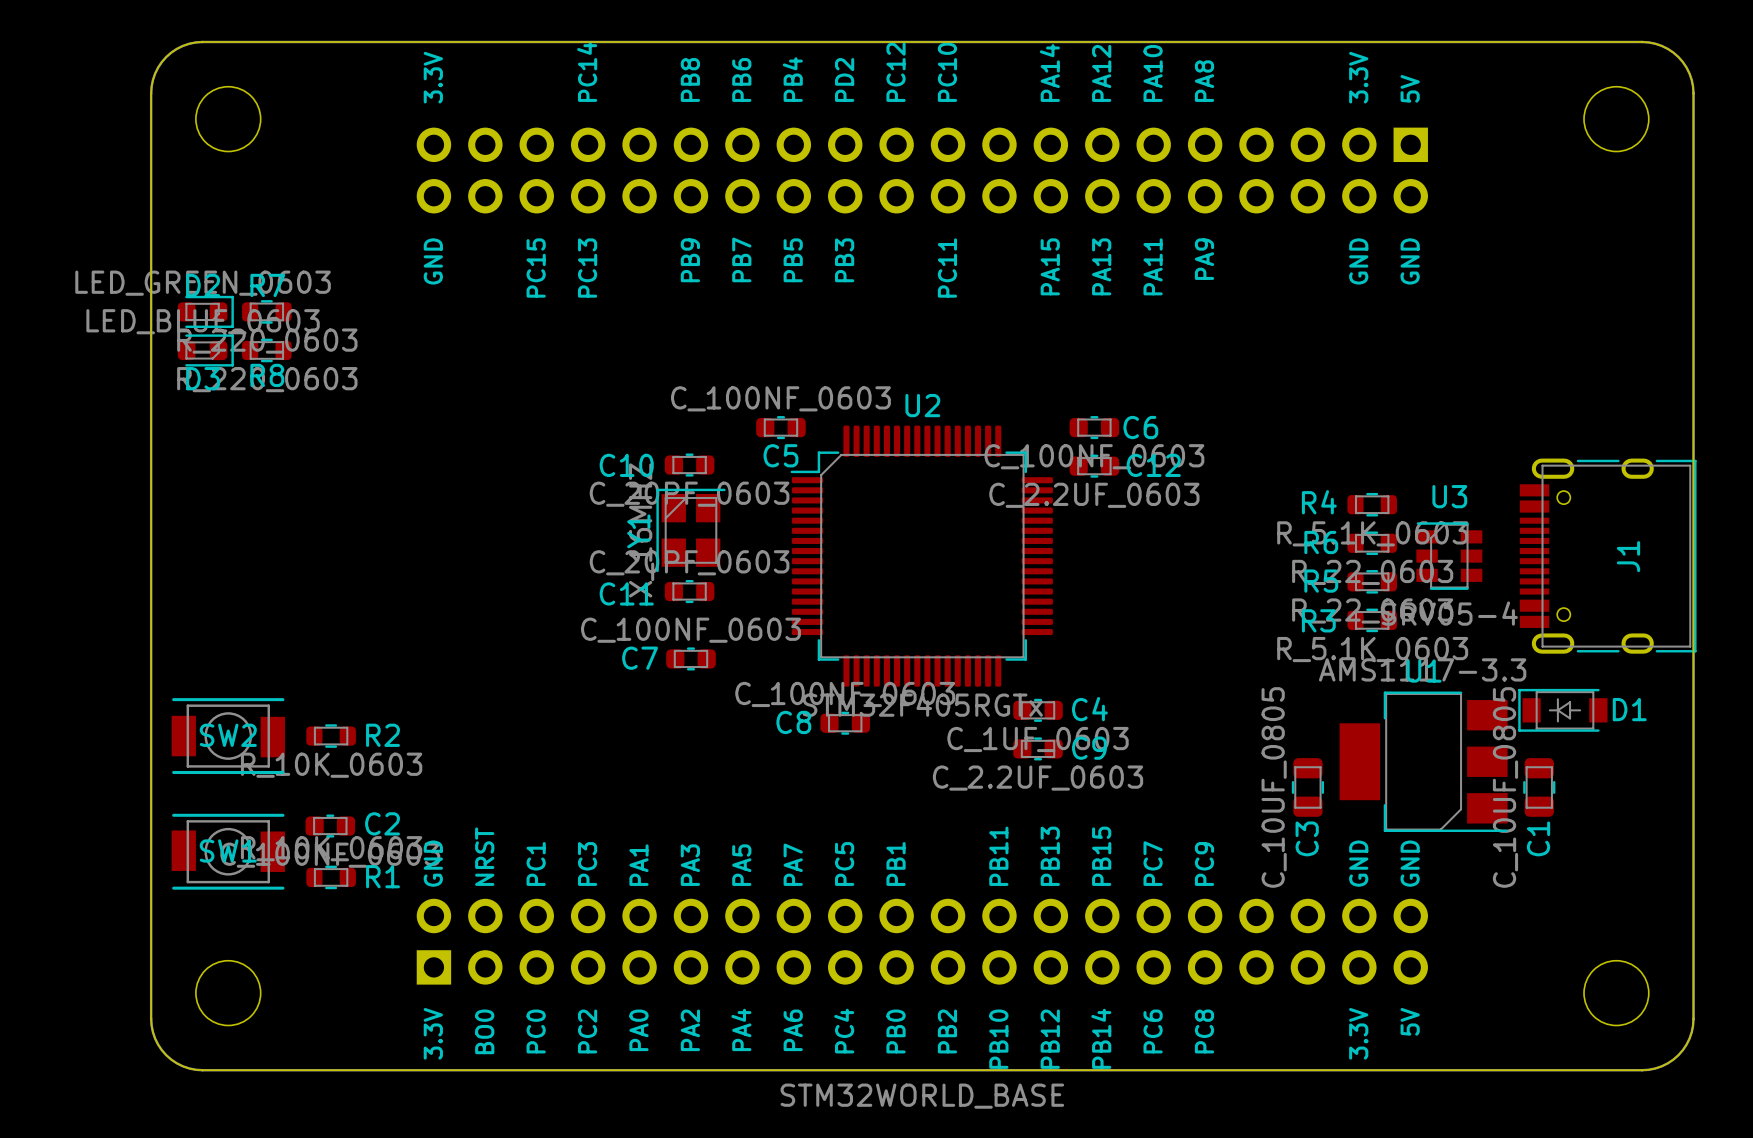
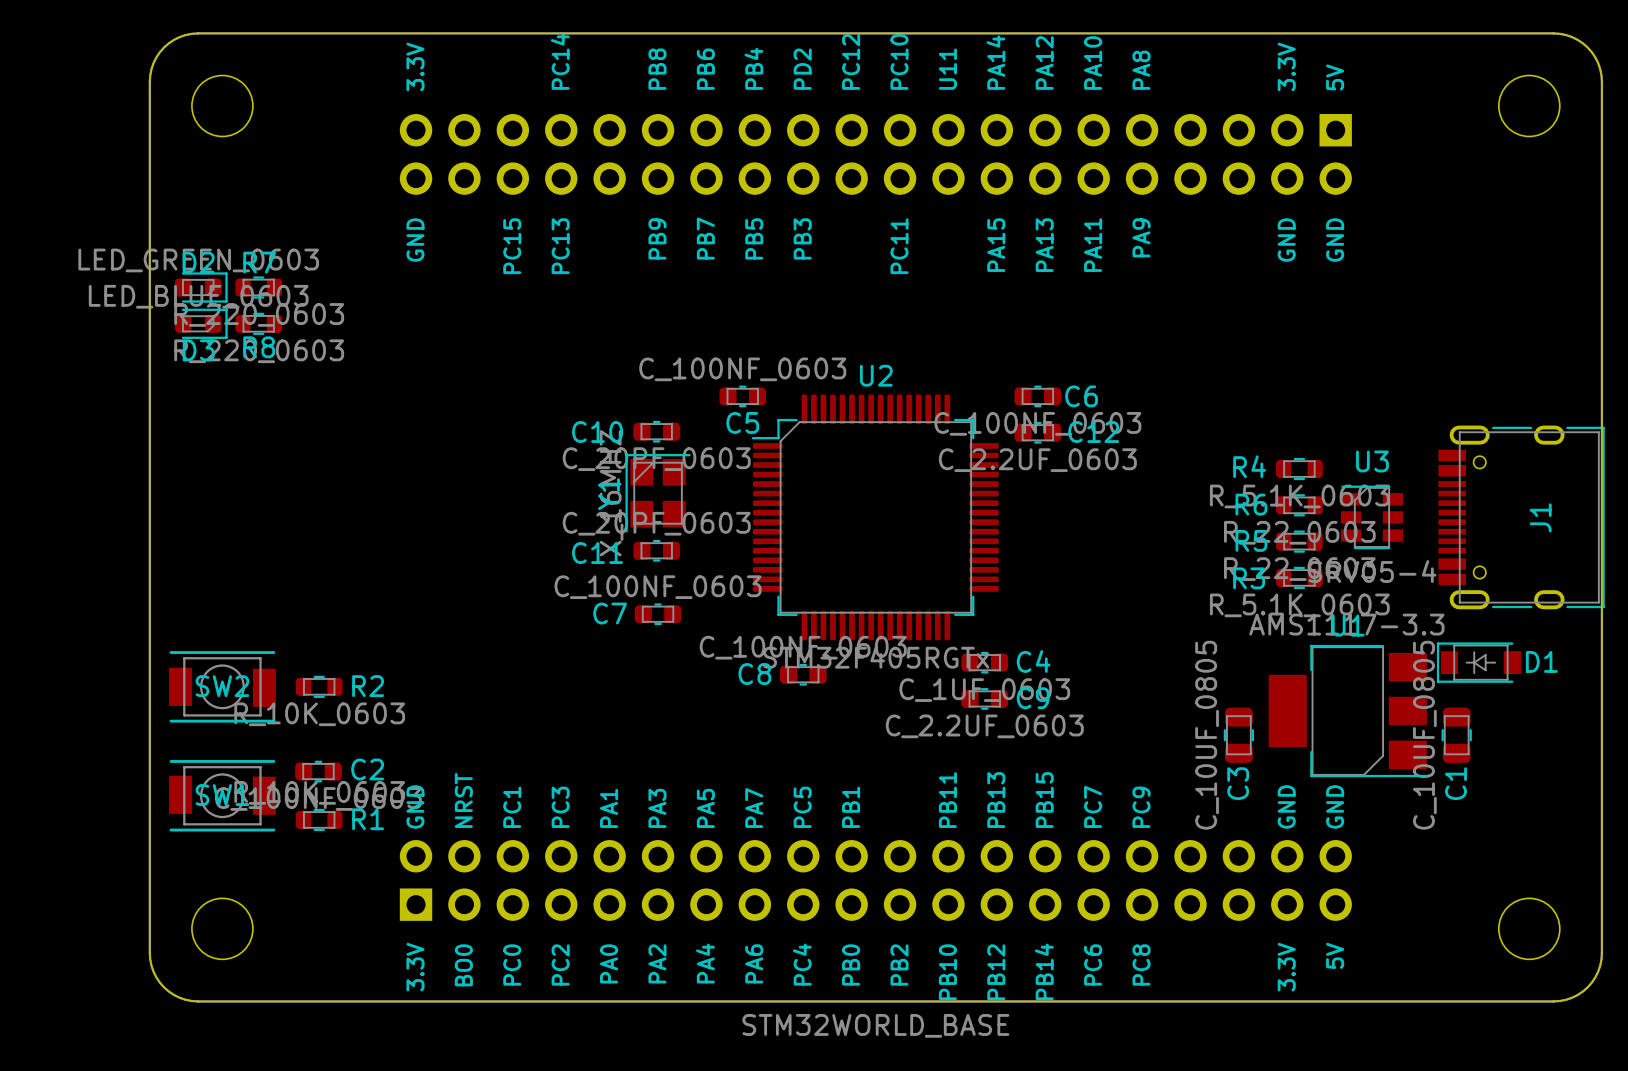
part text: none -> U11 (947, 69)

